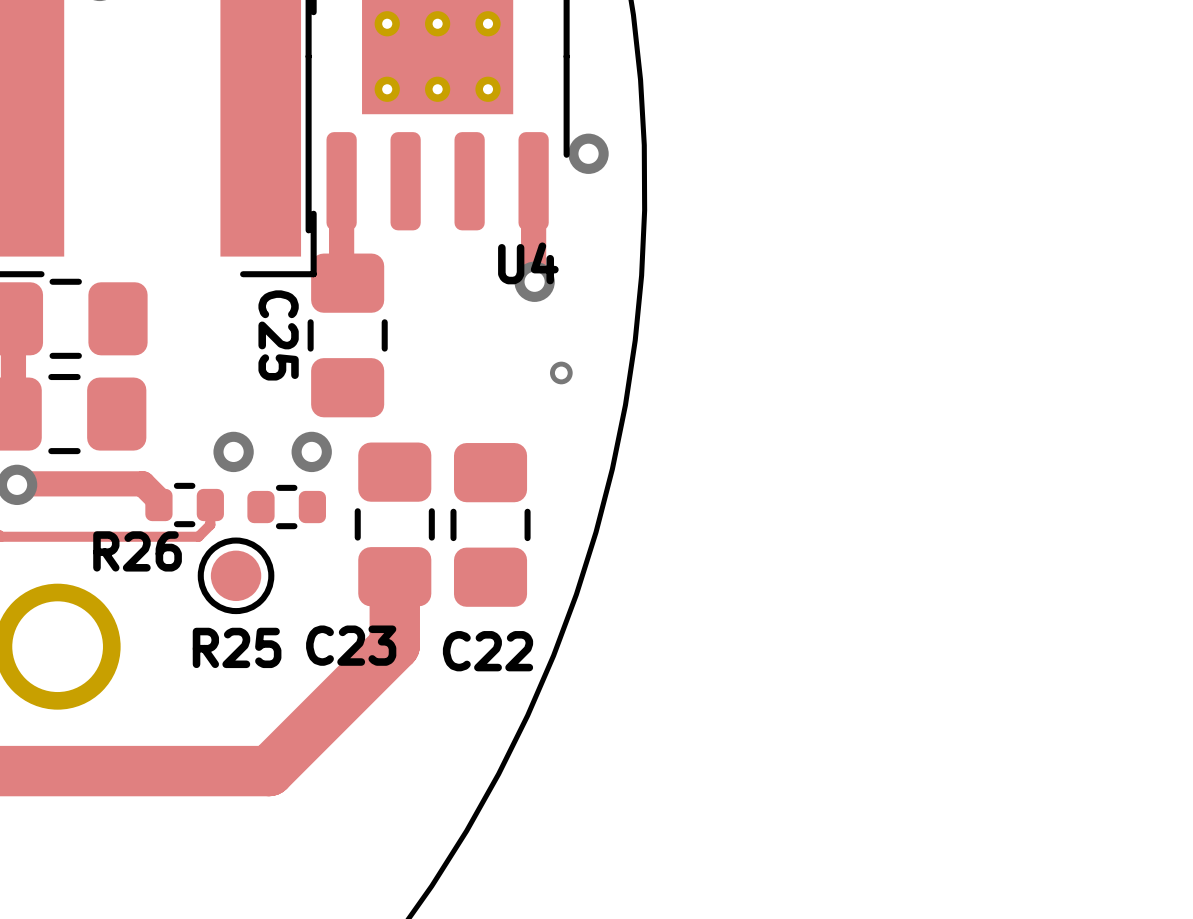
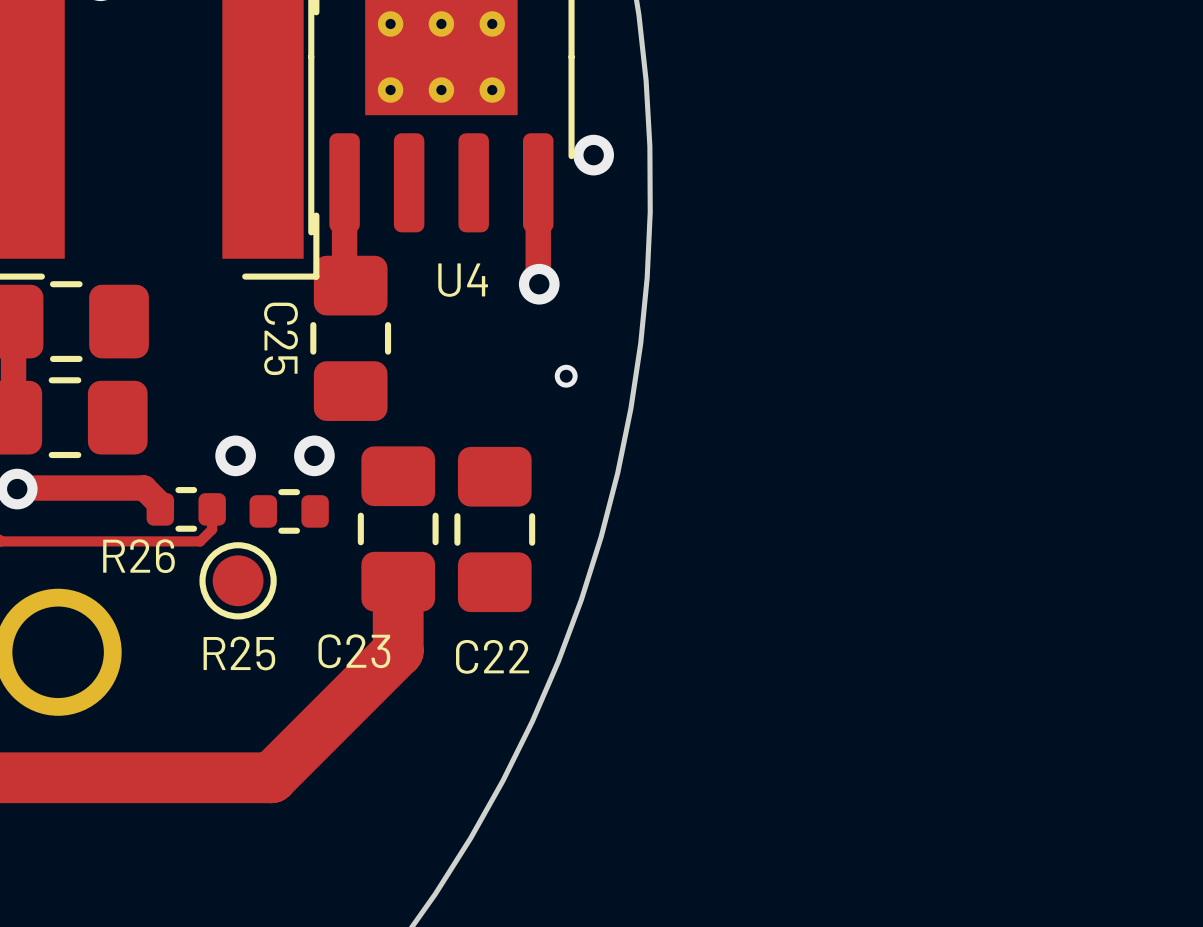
U4 name position: U4 (528, 263) -> U4 (463, 280)

